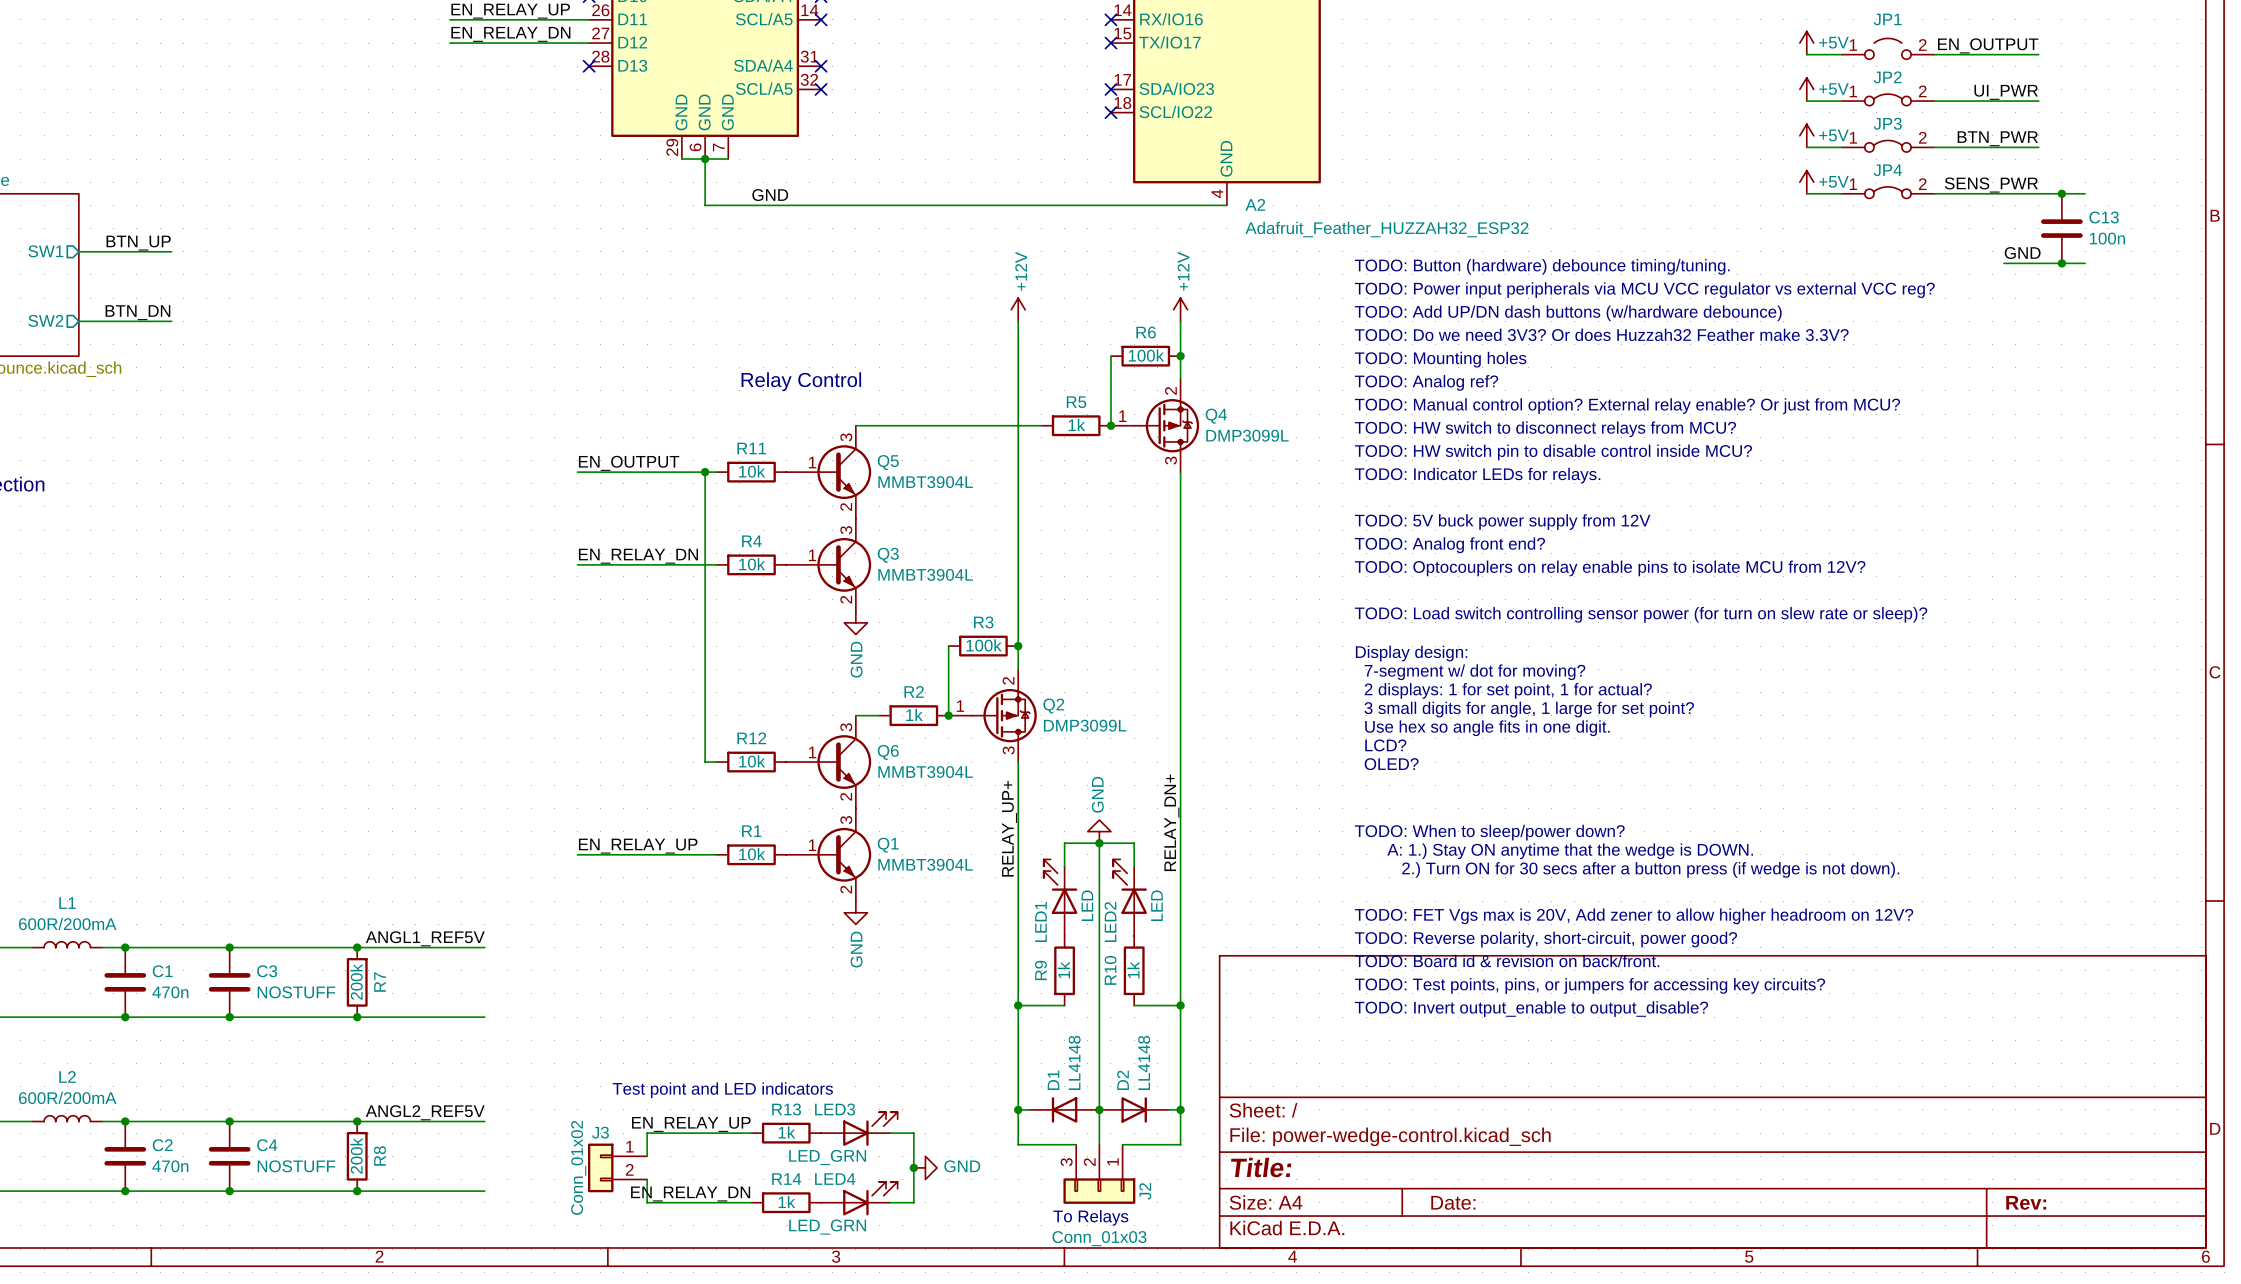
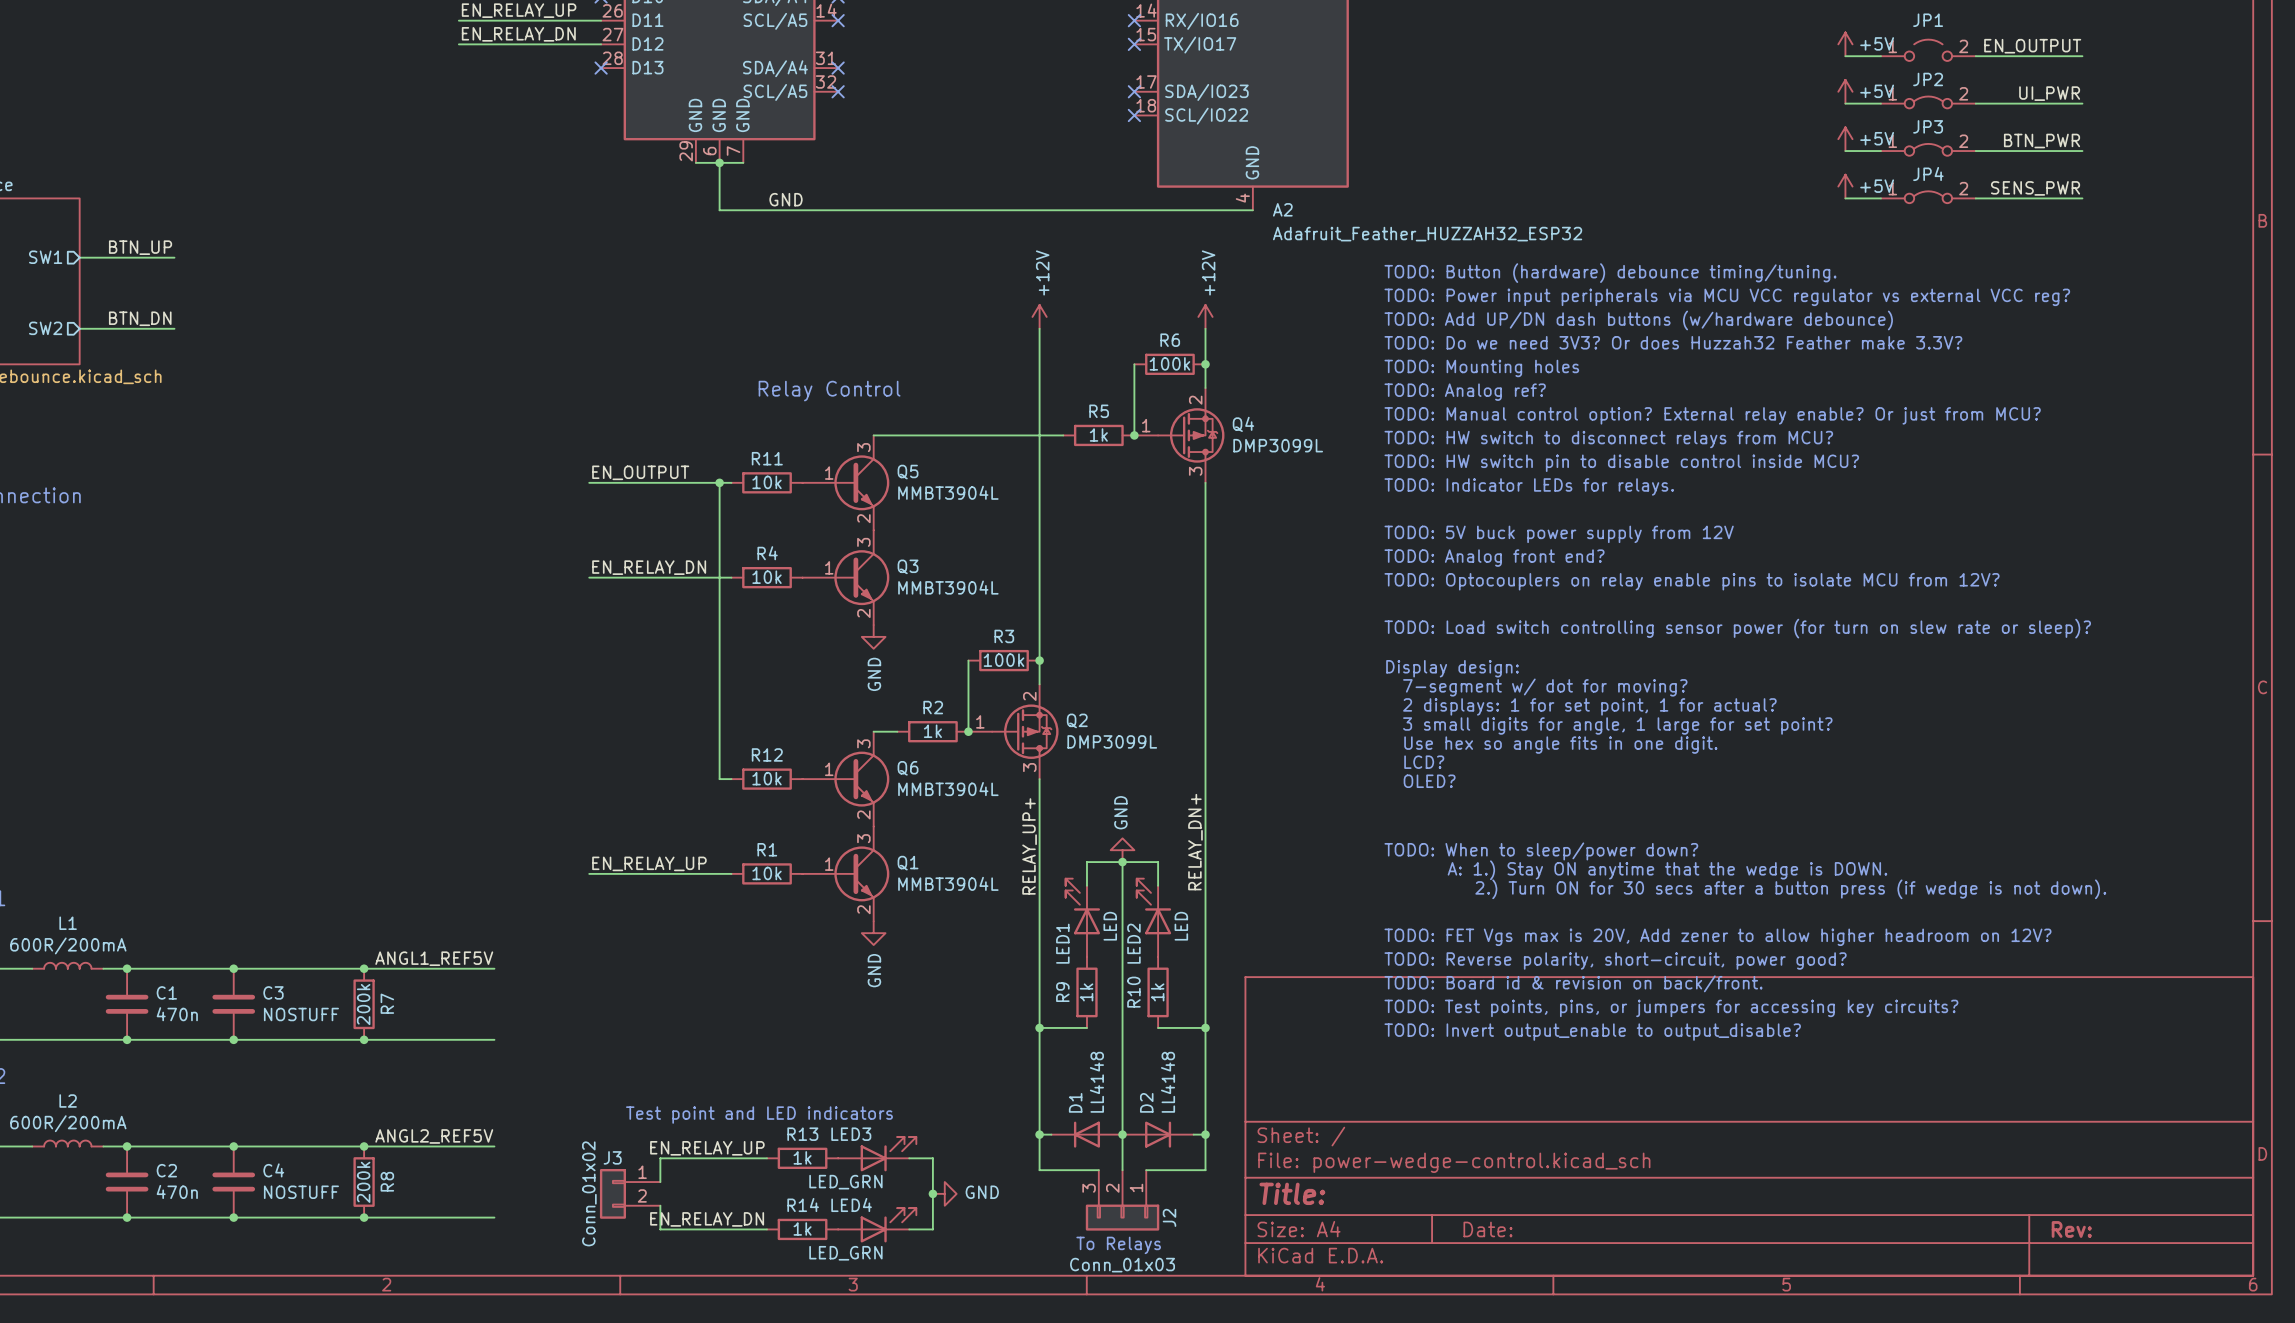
wire: (2038, 193) (2085, 193) -> none
junction: (2061, 193) -> none
C13: 100n (2061, 228) -> none
label: GND (2022, 253) -> none
wire: (2003, 263) (2085, 263) -> none
junction: (2061, 263) -> none

